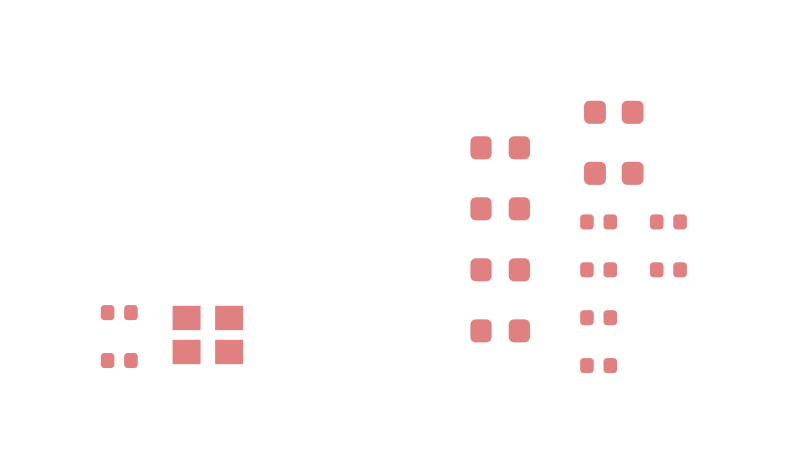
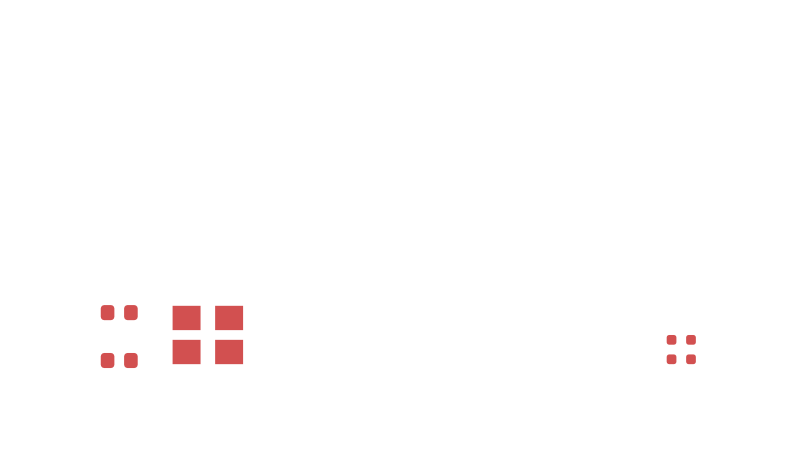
part: (613, 112) -> none
part: (500, 147) -> none
part: (613, 173) -> none
part: (500, 208) -> none
part: (598, 221) -> none
part: (668, 221) -> none
part: (500, 269) -> none
part: (598, 269) -> none
part: (668, 269) -> none
part: (598, 317) -> none
part: (500, 330) -> none
part: none -> (681, 349)
part: (598, 365) -> none

